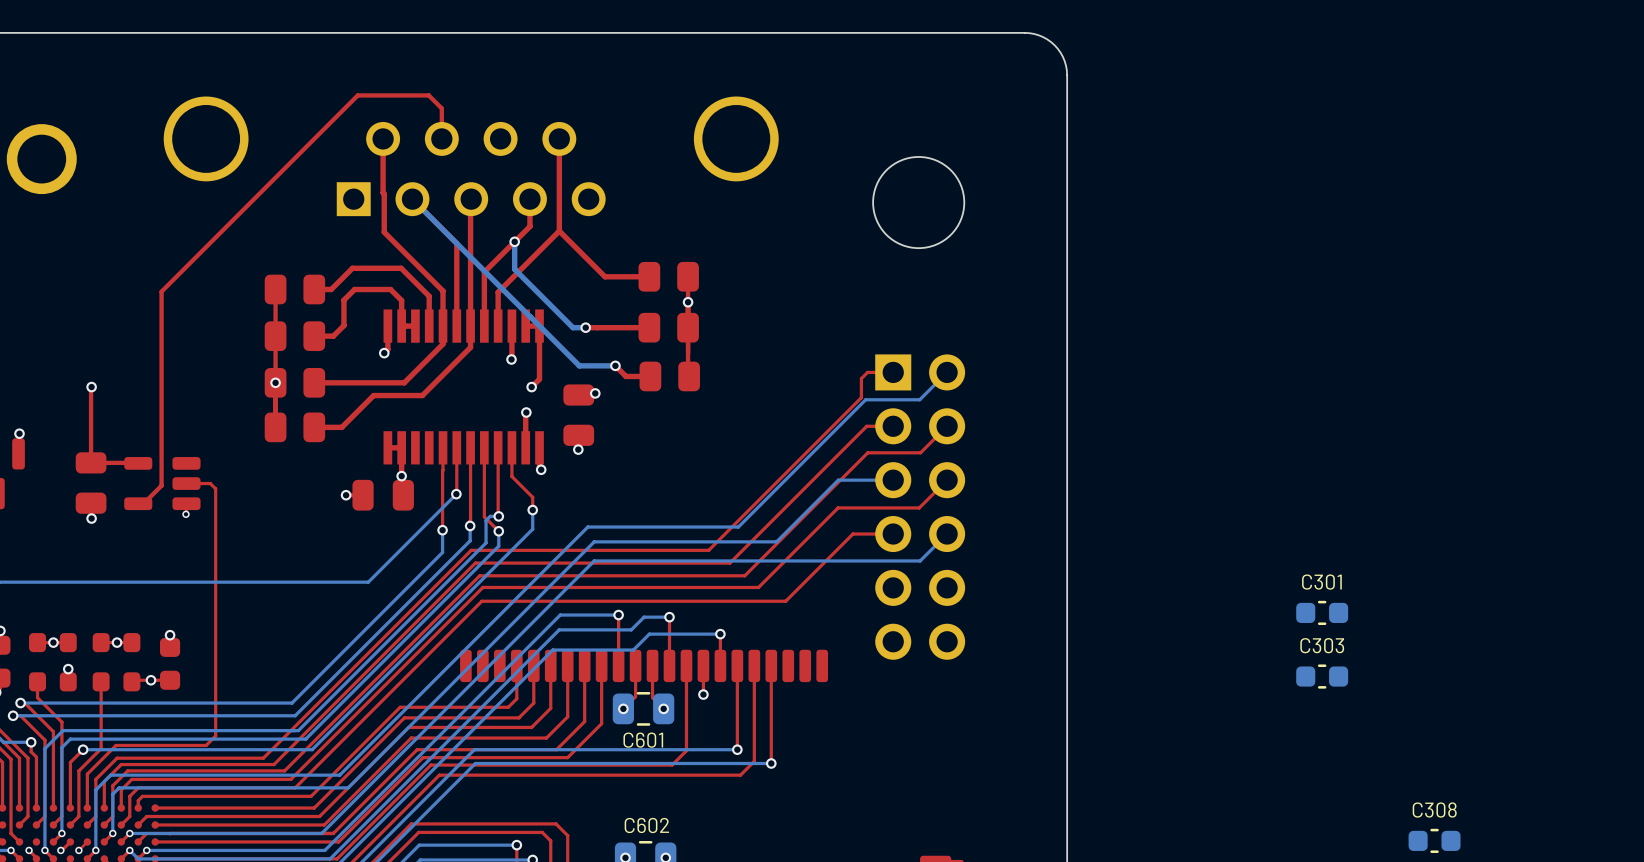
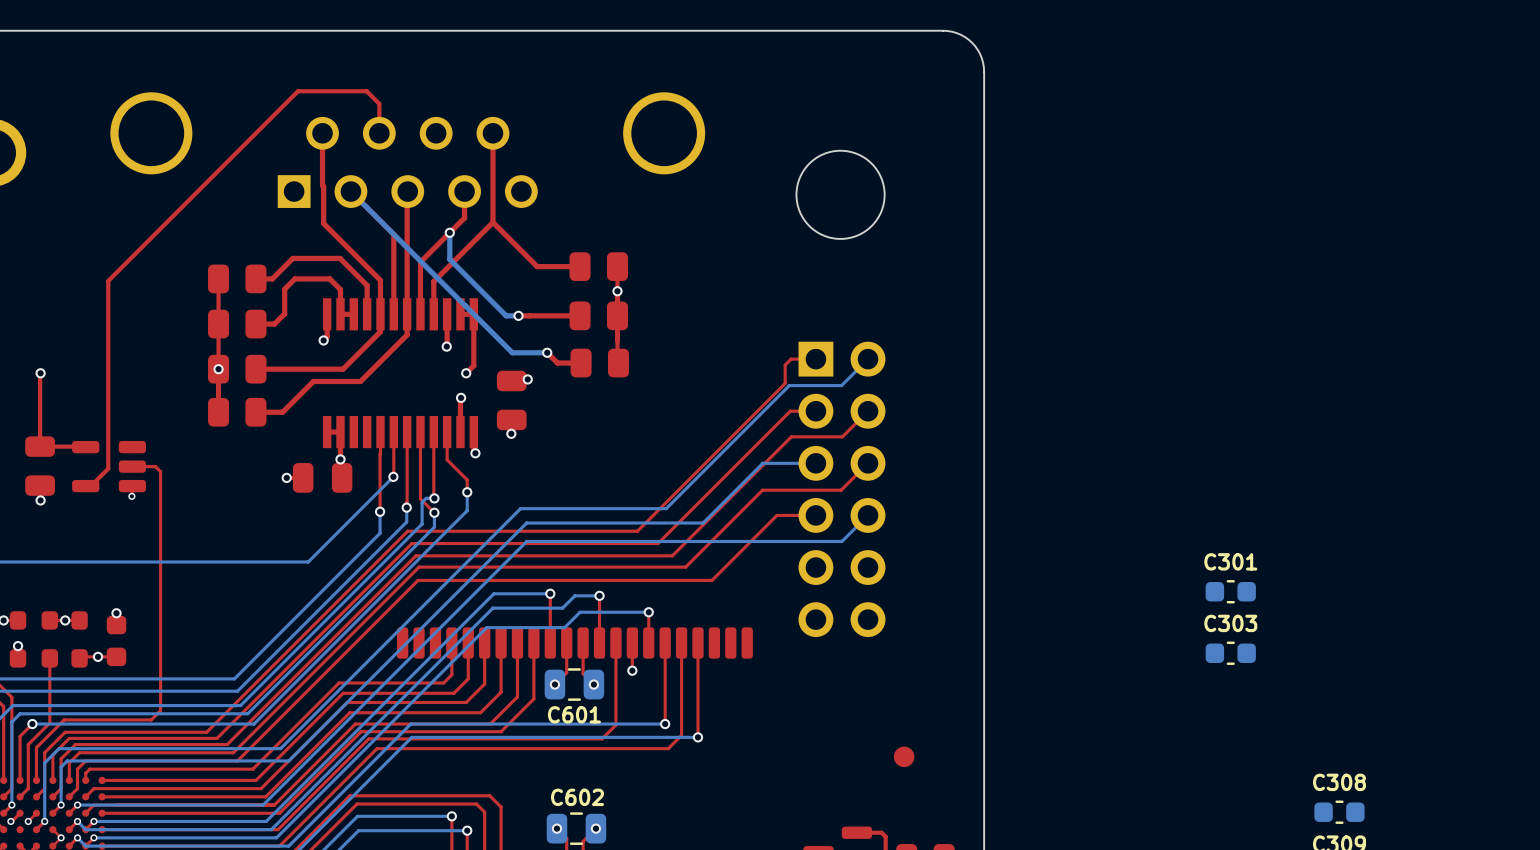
part: none -> (904, 756)

